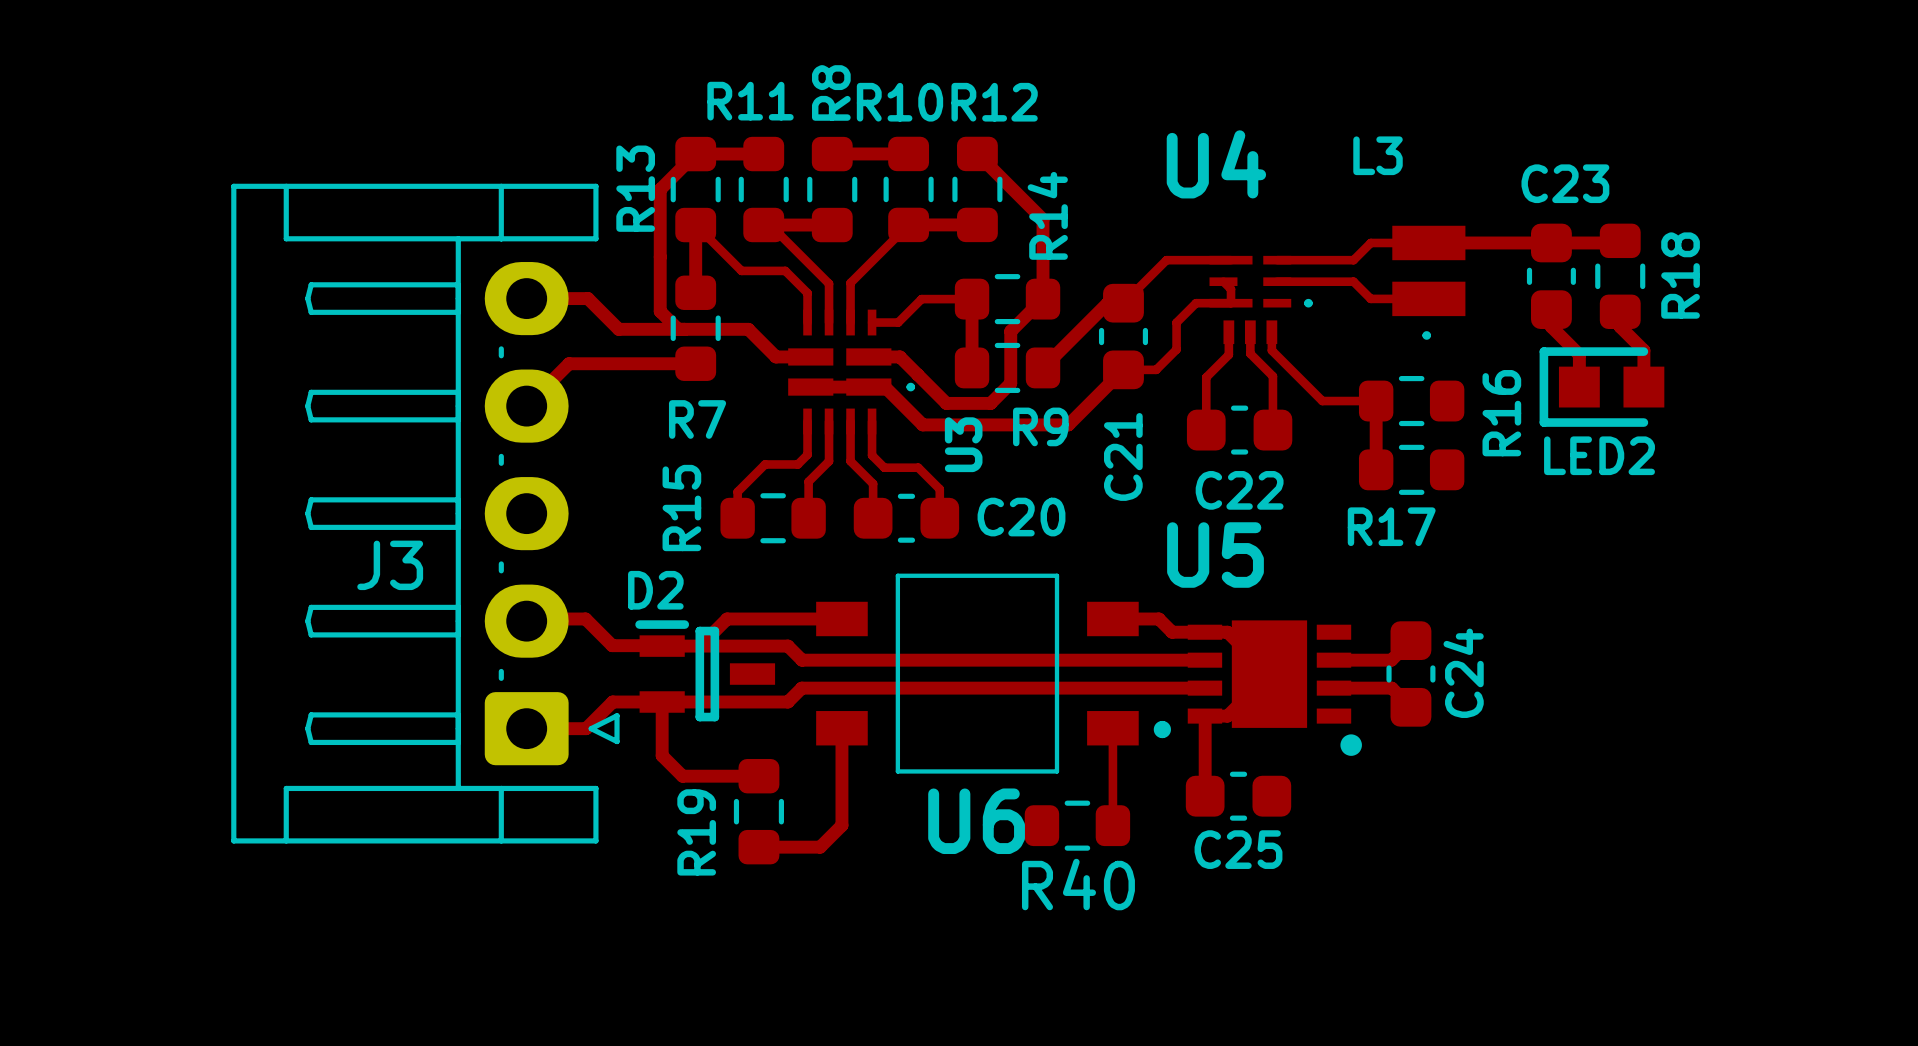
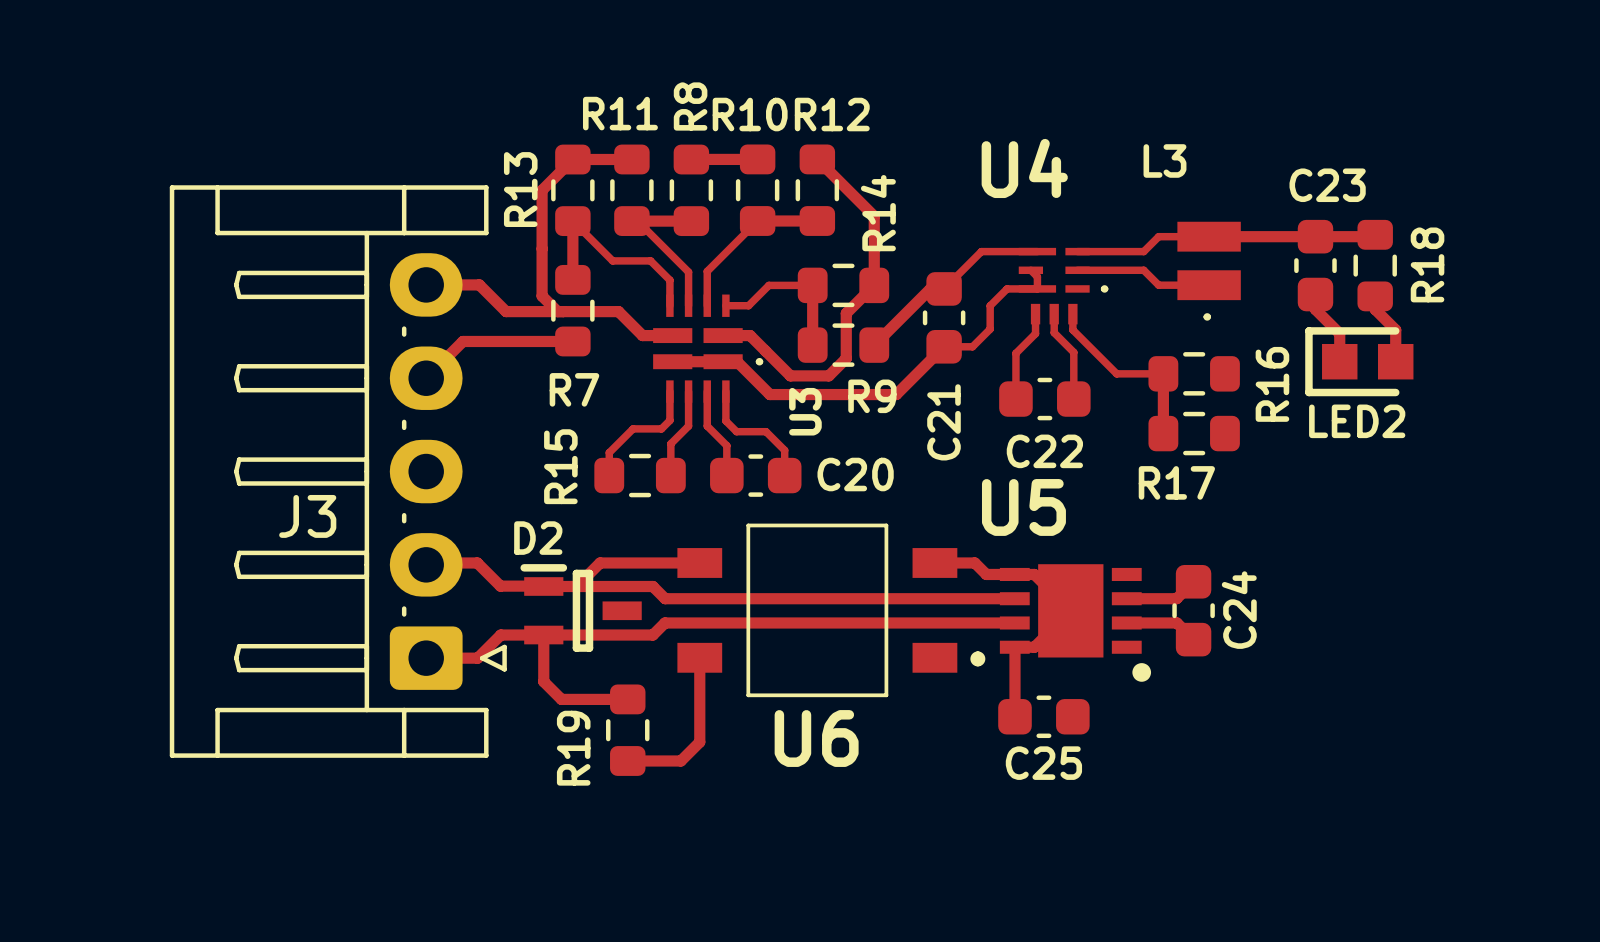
top track: (1112, 728) (1112, 825) -> none
R40: (1077, 825) -> none

